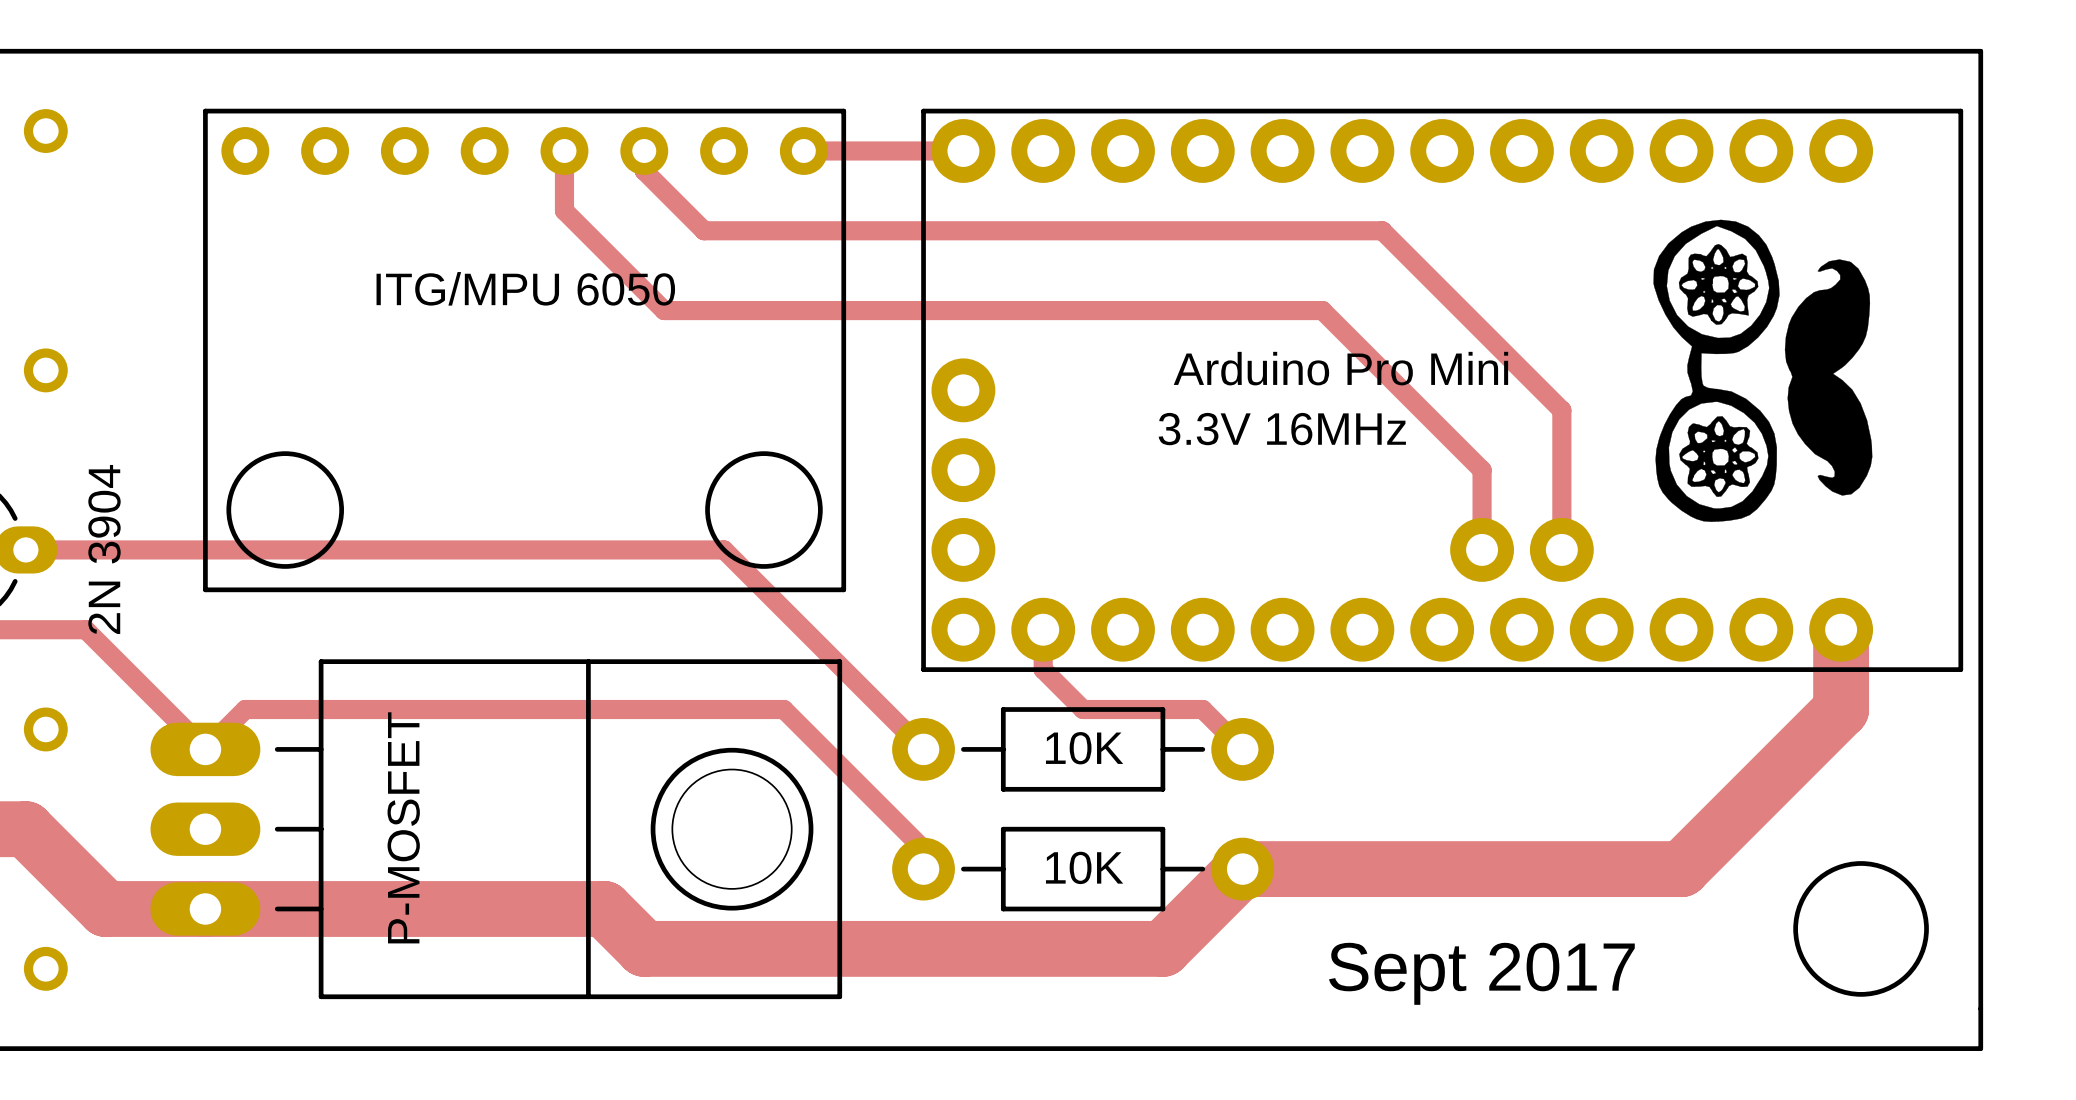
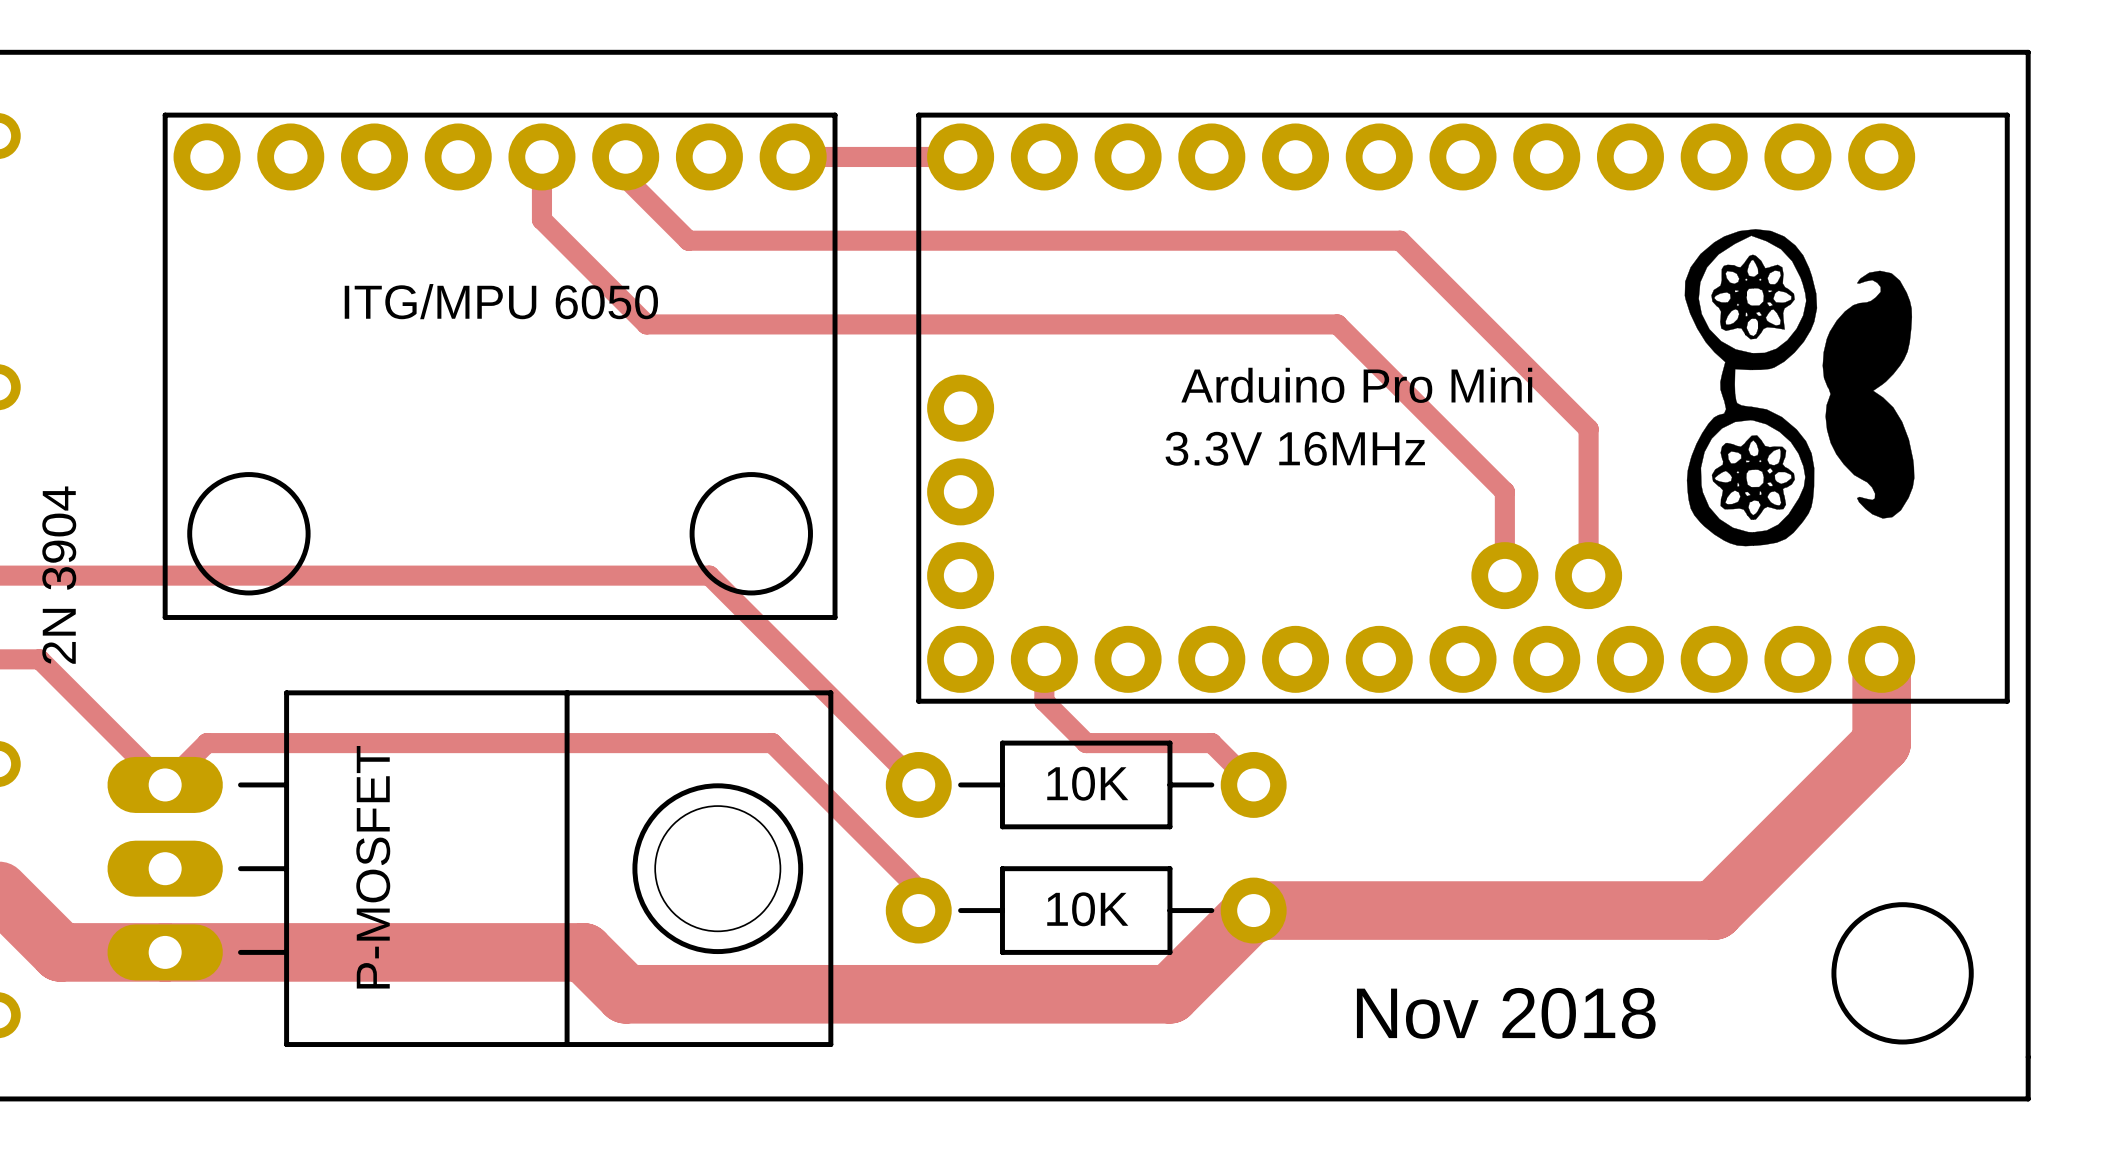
ITG/MPU 6050 footprint: [203, 108, 847, 593] -> [162, 112, 838, 620]
text: Sept 2017 (1481, 973) -> Nov 2018 (1506, 1013)

